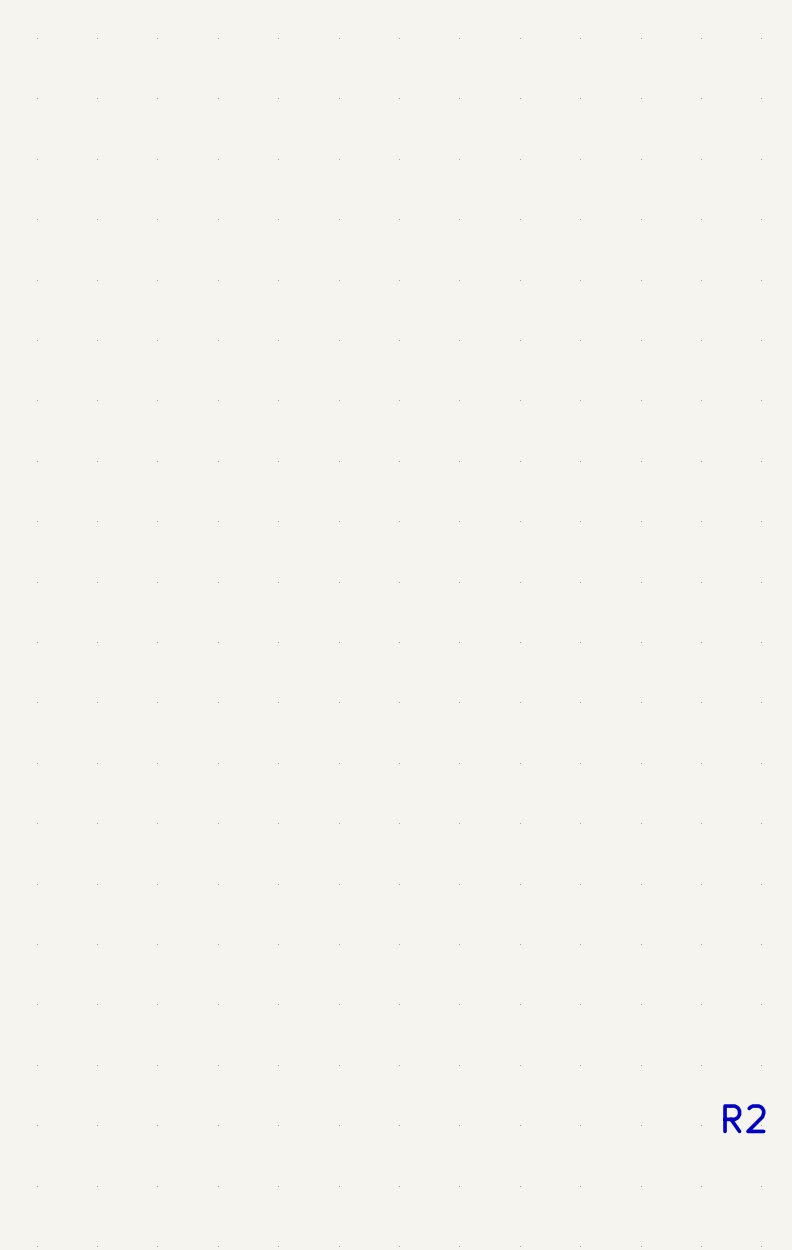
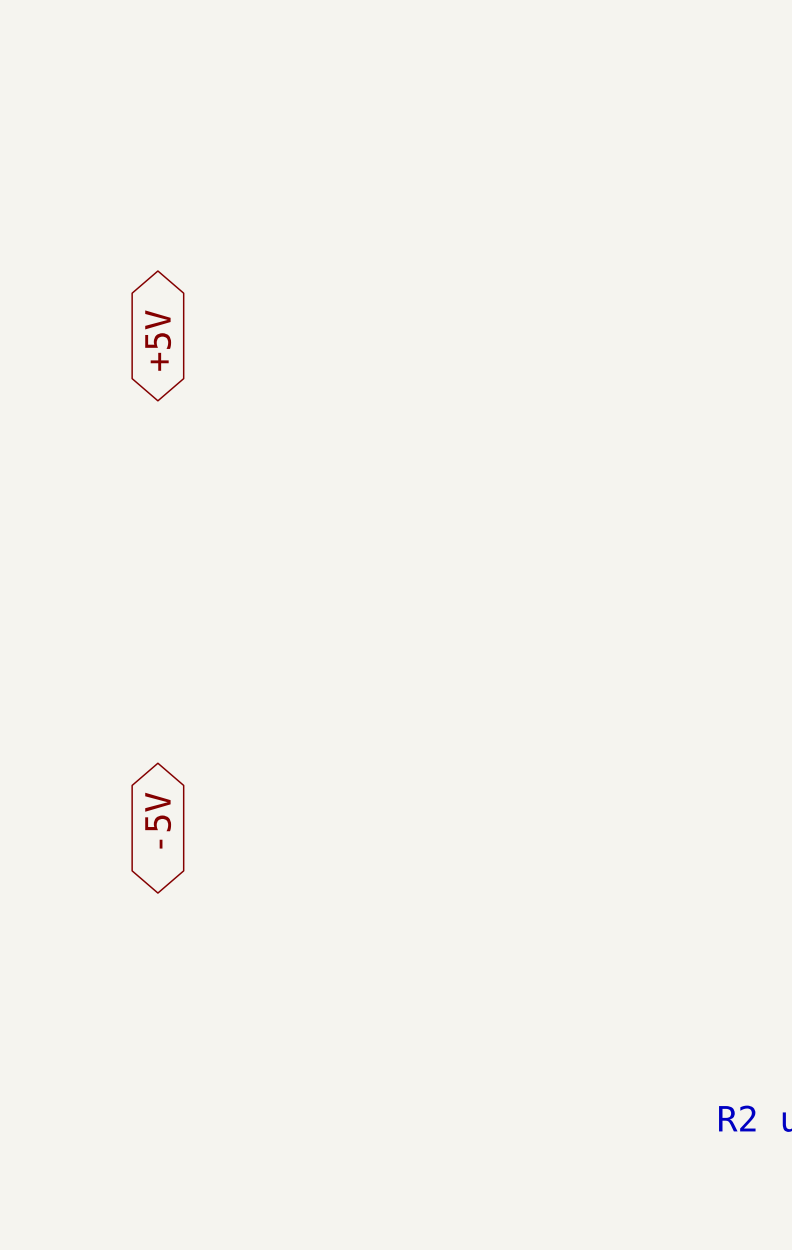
global label: none -> +5V (158, 340)
global label: none -> -5V (158, 820)

